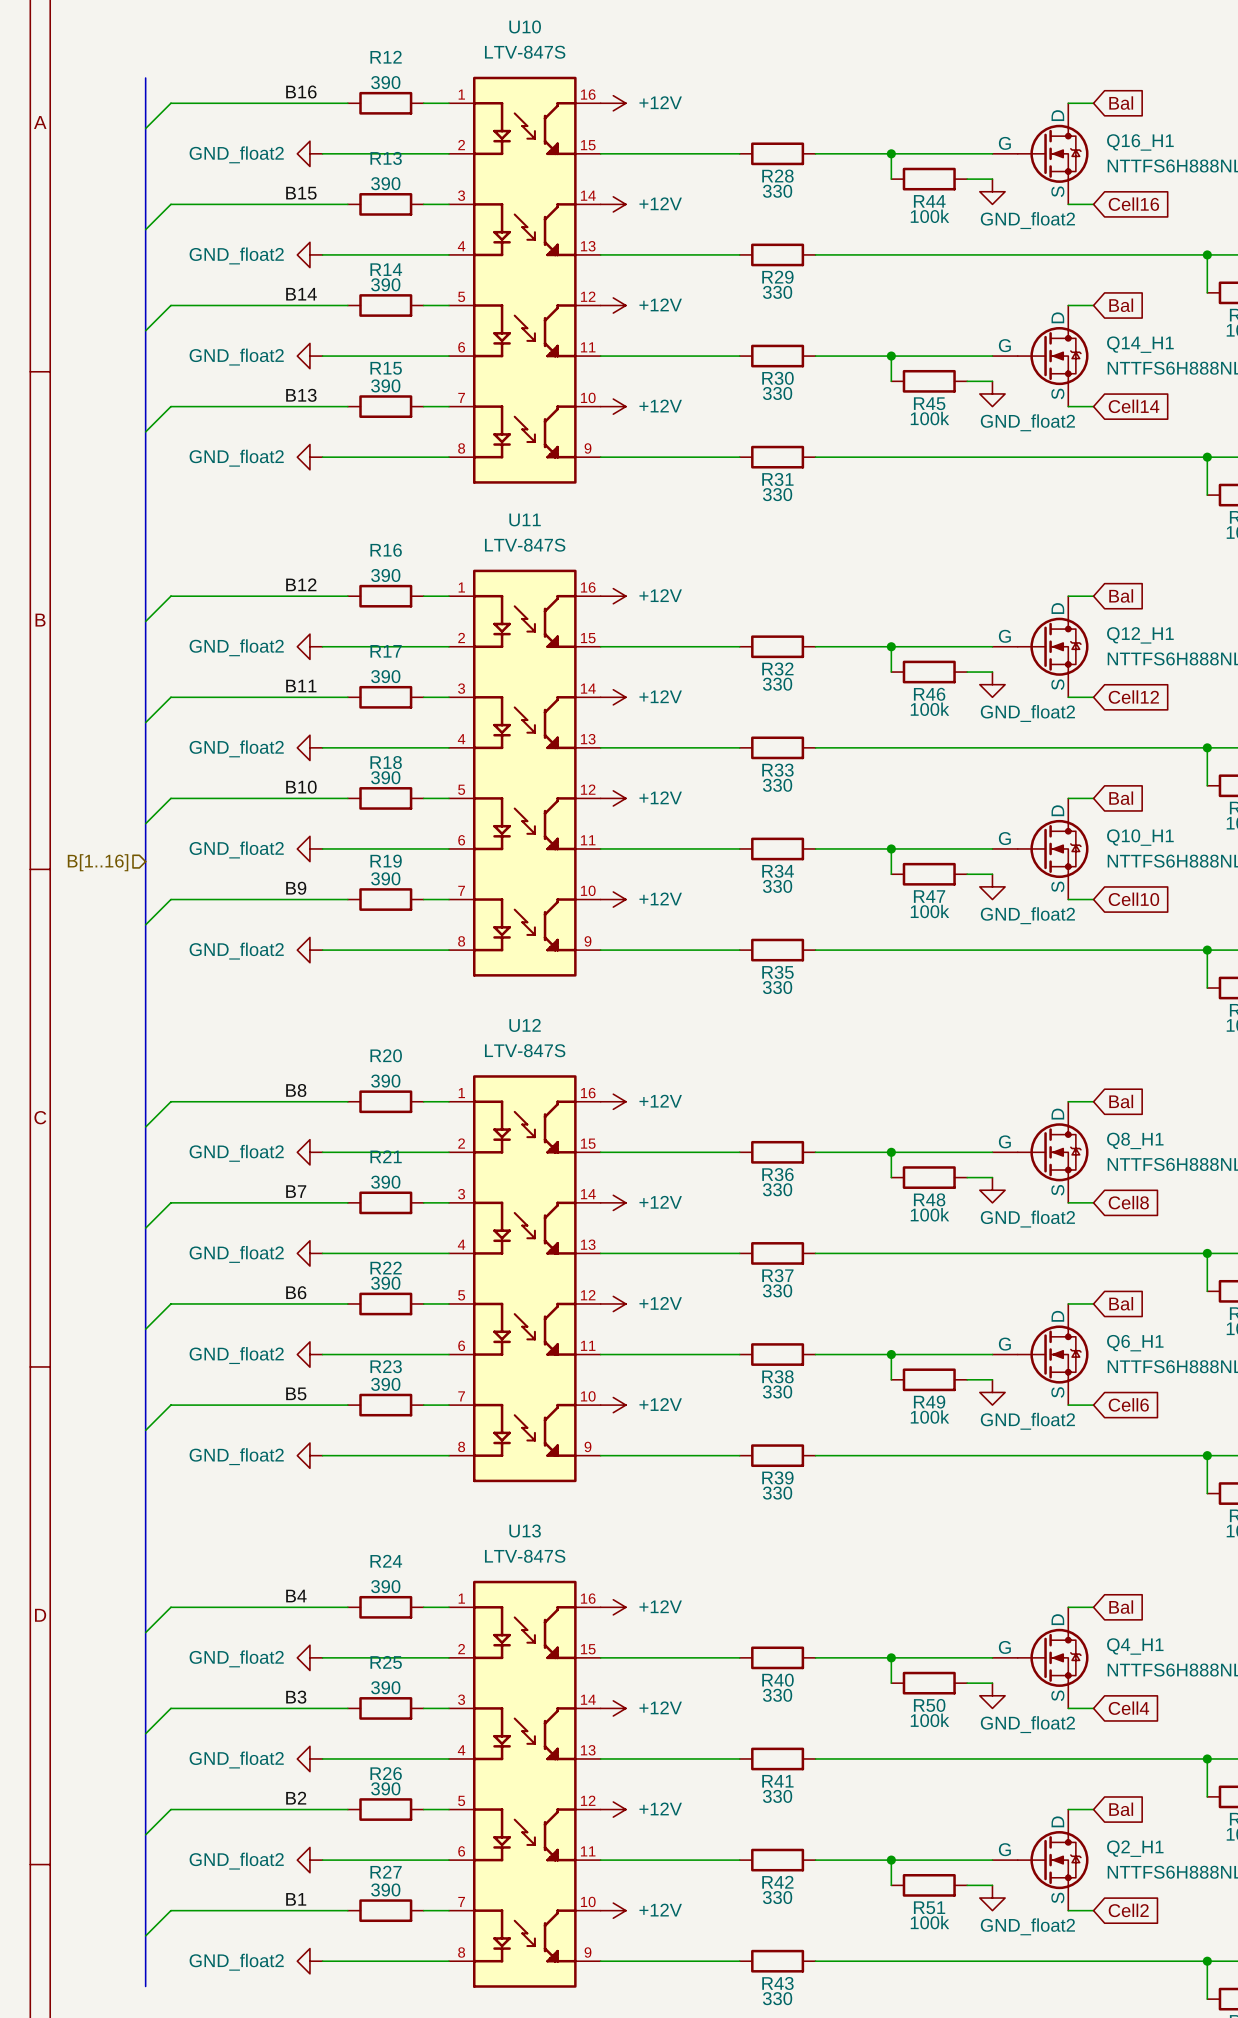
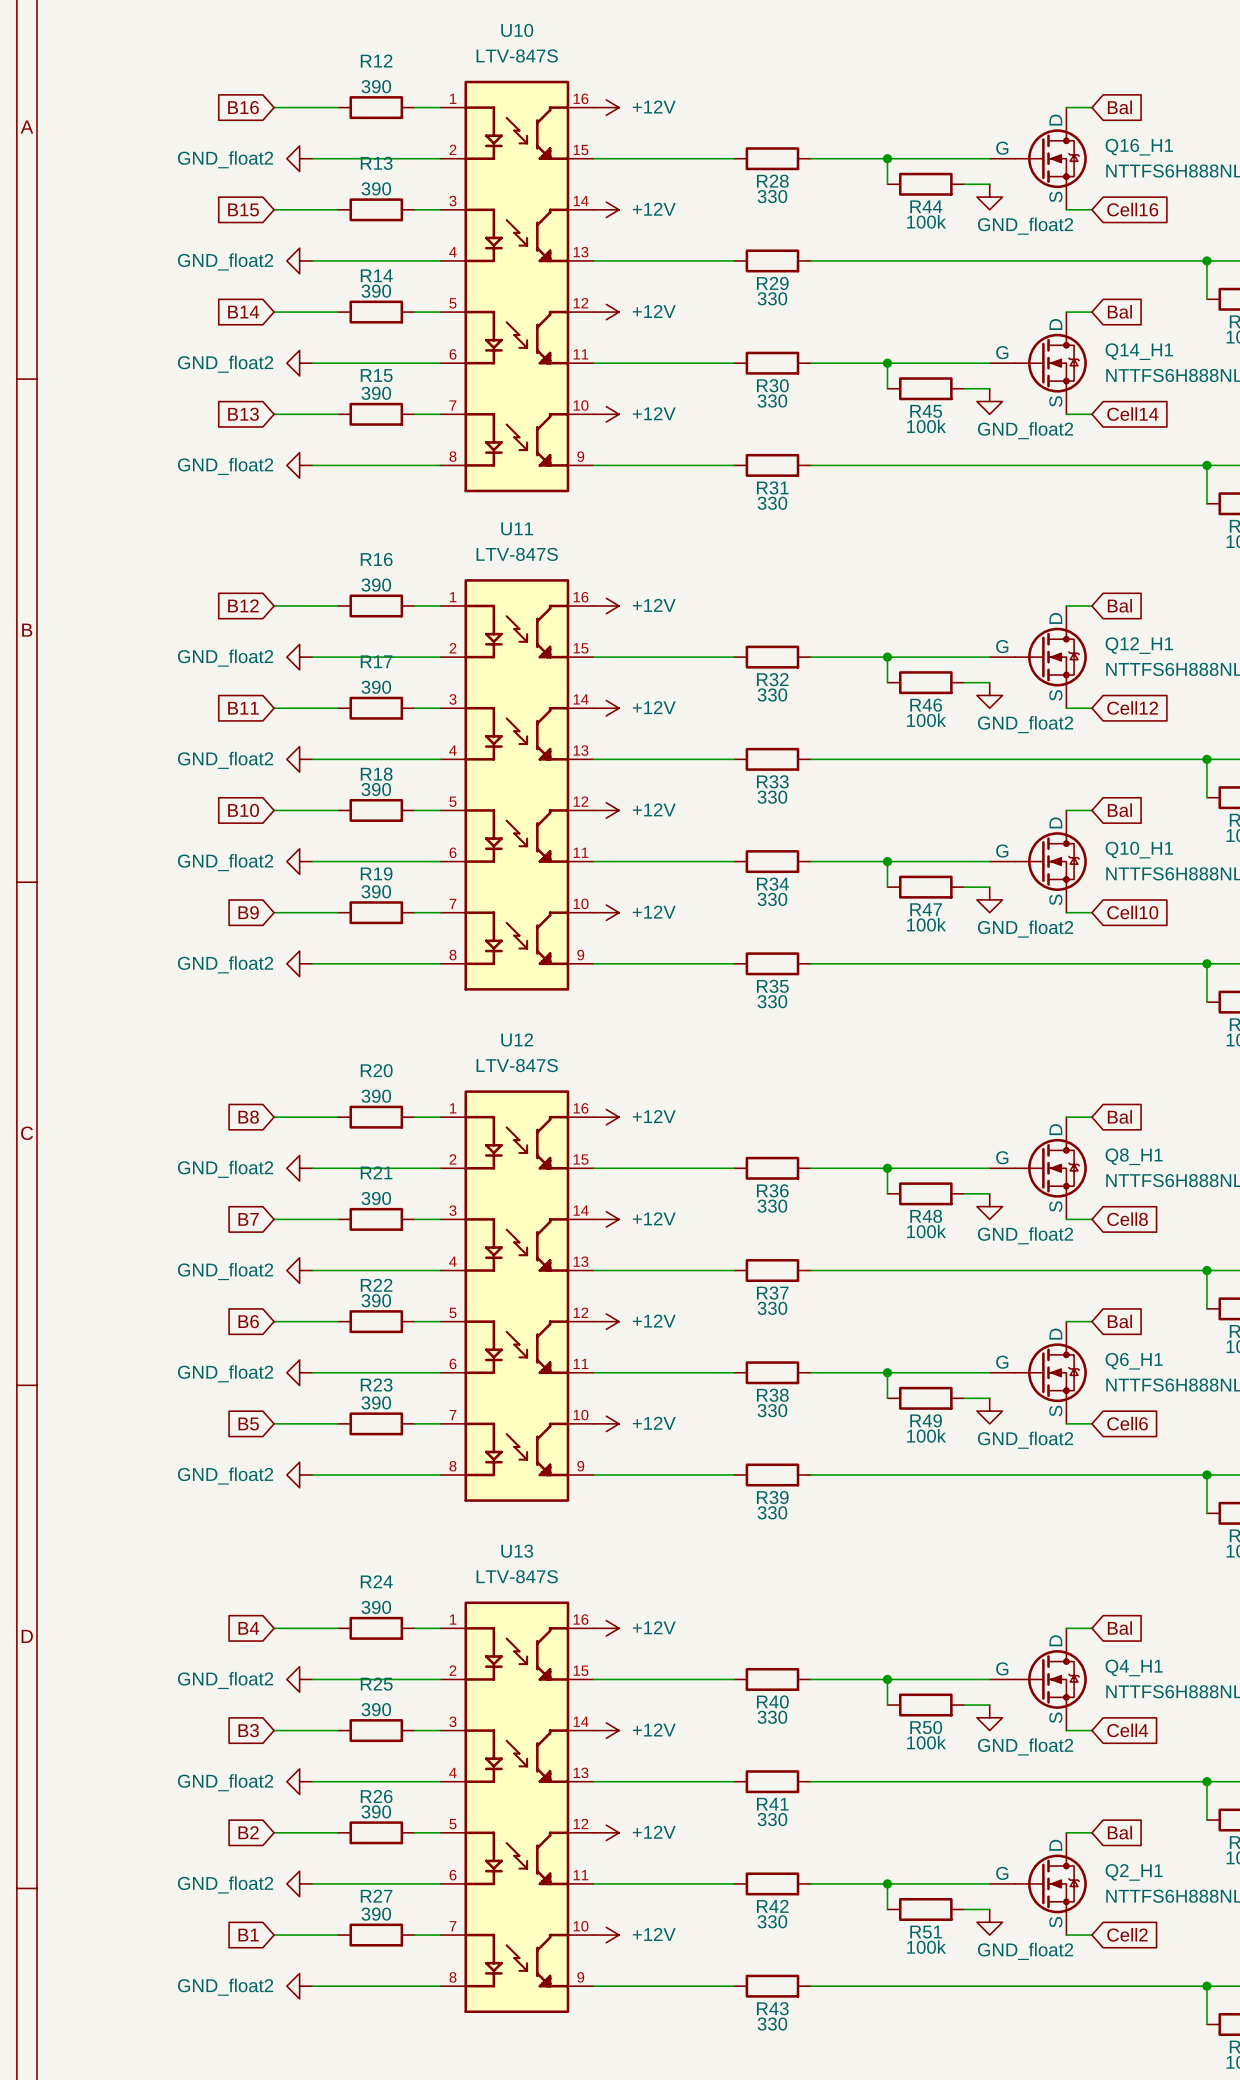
bus: (145, 77) (145, 1986) -> none
label: B16 (301, 91) -> none
global label: none -> B16 (243, 107)
wire: (284, 103) (170, 103) (145, 128) -> none
label: B15 (301, 193) -> none
global label: none -> B15 (243, 209)
wire: (284, 204) (170, 204) (145, 229) -> none
label: B14 (301, 294) -> none
global label: none -> B14 (243, 312)
wire: (284, 305) (170, 305) (145, 330) -> none
label: B13 (301, 395) -> none
global label: none -> B13 (243, 414)
wire: (284, 406) (170, 406) (145, 431) -> none
label: B12 (301, 584) -> none
global label: none -> B12 (243, 605)
wire: (284, 596) (170, 596) (145, 621) -> none
label: B11 (301, 686) -> none
global label: none -> B11 (243, 708)
wire: (284, 697) (170, 697) (145, 722) -> none
label: B10 (301, 787) -> none
global label: none -> B10 (243, 810)
wire: (284, 798) (170, 798) (145, 823) -> none
hierarchical label: B[1..16] (98, 862) -> none
label: B9 (296, 888) -> none
global label: none -> B9 (248, 912)
wire: (284, 899) (170, 899) (145, 924) -> none
label: B8 (296, 1090) -> none
global label: none -> B8 (248, 1117)
wire: (284, 1101) (170, 1101) (145, 1127) -> none
label: B7 (296, 1191) -> none
global label: none -> B7 (248, 1219)
wire: (284, 1202) (170, 1202) (145, 1228) -> none
label: B6 (296, 1292) -> none
global label: none -> B6 (248, 1321)
wire: (284, 1303) (170, 1303) (145, 1329) -> none
label: B5 (296, 1393) -> none
global label: none -> B5 (248, 1423)
wire: (284, 1405) (170, 1405) (145, 1430) -> none
label: B4 (296, 1596) -> none
global label: none -> B4 (248, 1628)
wire: (284, 1607) (170, 1607) (145, 1632) -> none
label: B3 (296, 1697) -> none
global label: none -> B3 (248, 1730)
wire: (284, 1708) (170, 1708) (145, 1733) -> none
label: B2 (296, 1798) -> none
global label: none -> B2 (248, 1832)
wire: (284, 1809) (170, 1809) (145, 1834) -> none
label: B1 (296, 1899) -> none
global label: none -> B1 (248, 1935)
wire: (284, 1910) (170, 1910) (145, 1935) -> none

